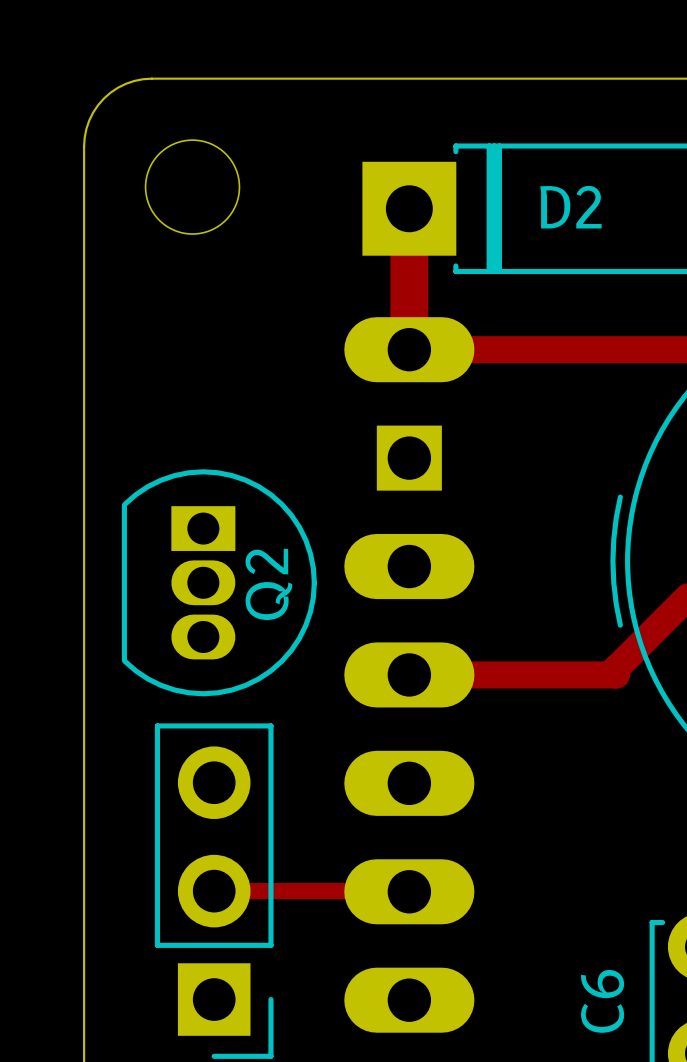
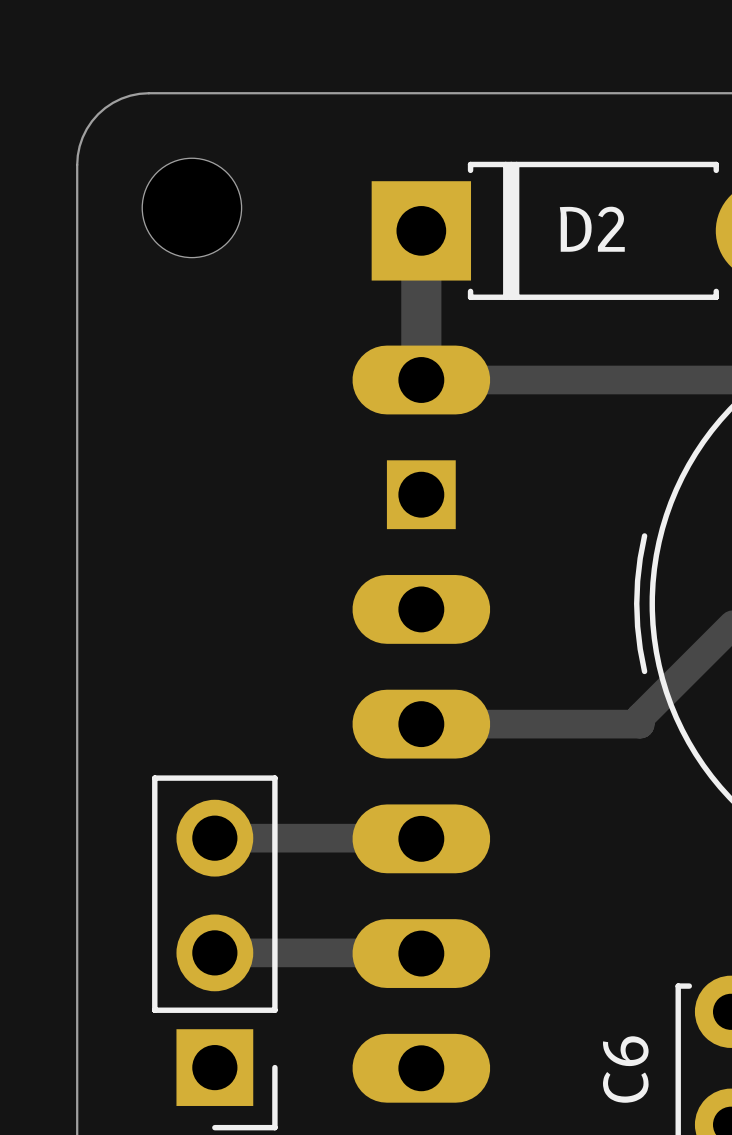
Q2: (219, 582) -> none
track: none -> (214, 838) (420, 838)
track width: thin (214, 891) (409, 891) -> thick (214, 952) (421, 953)

